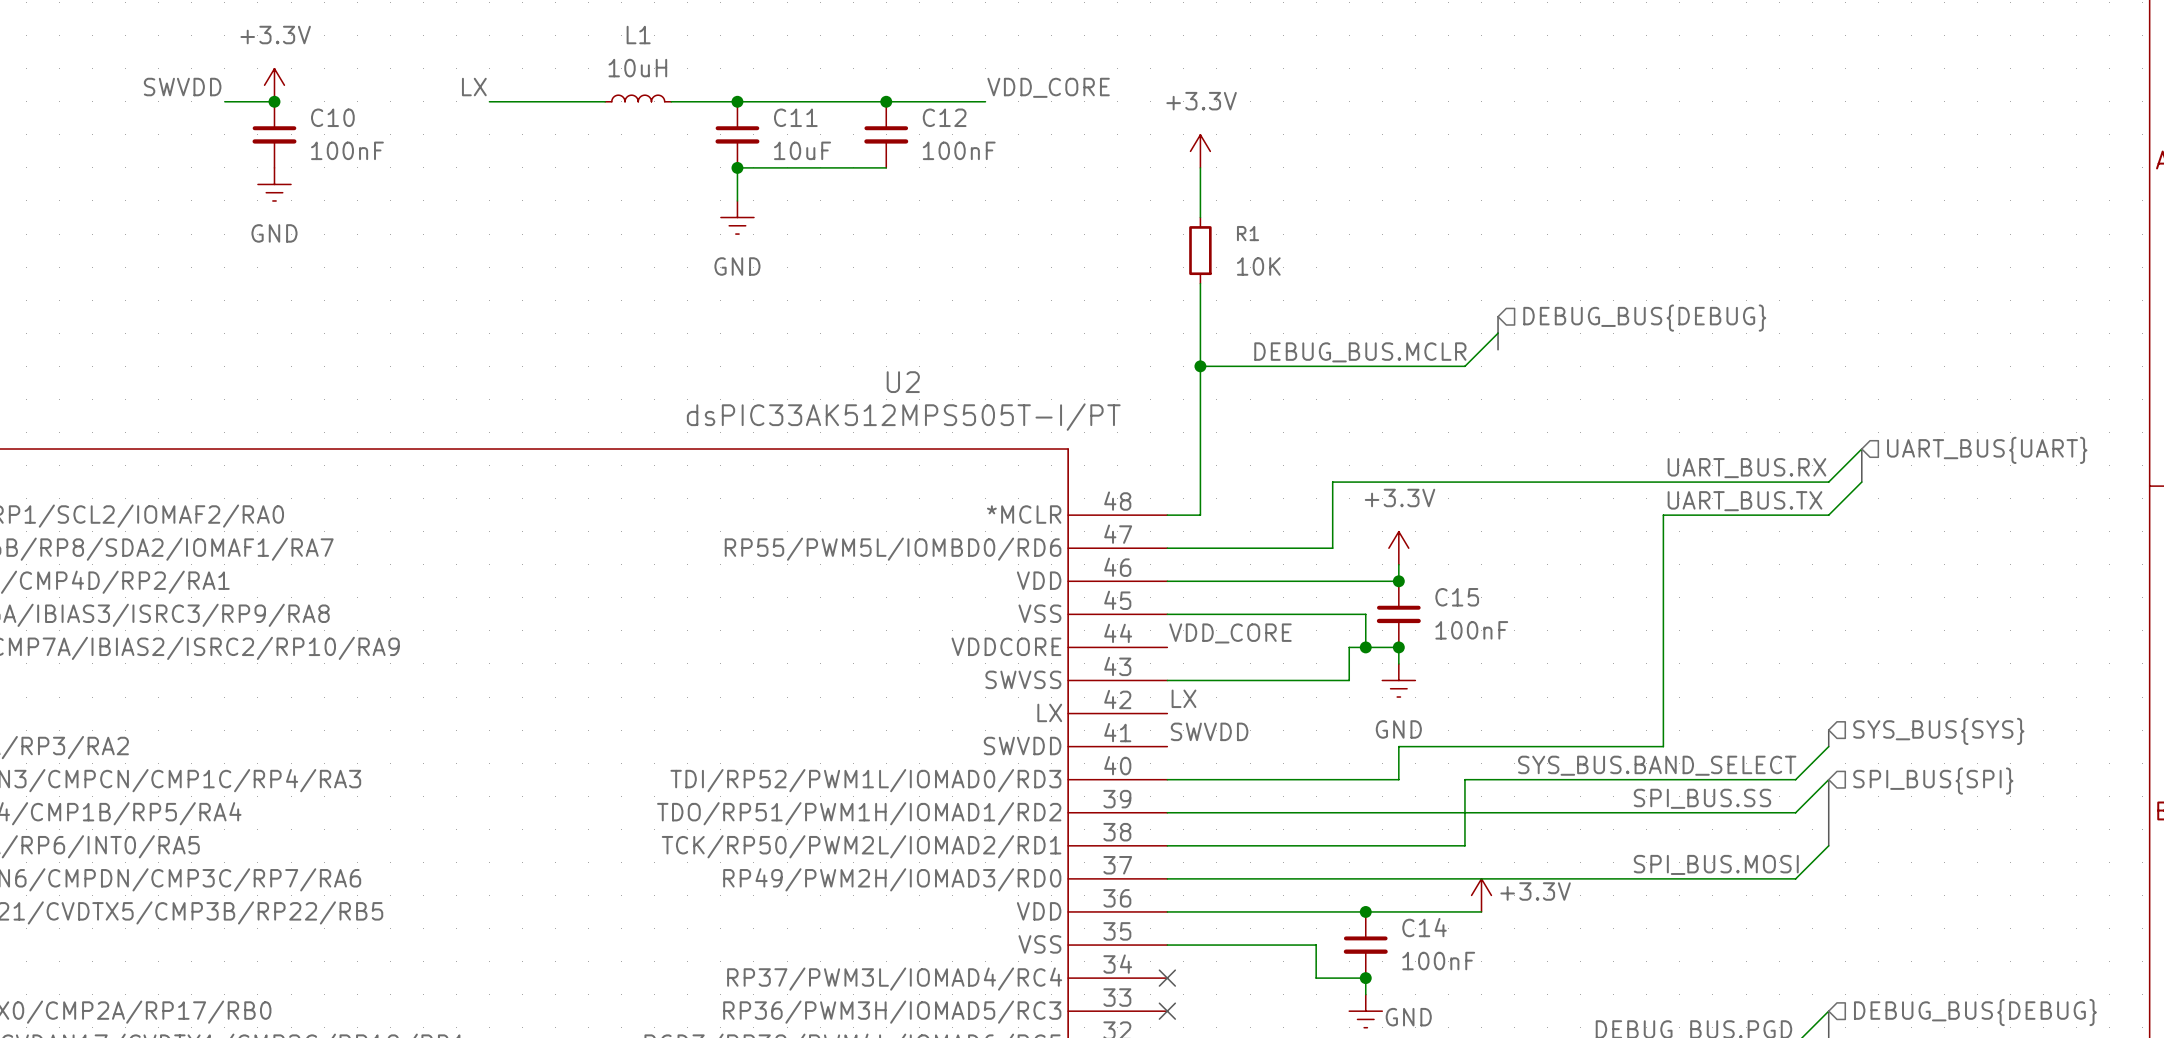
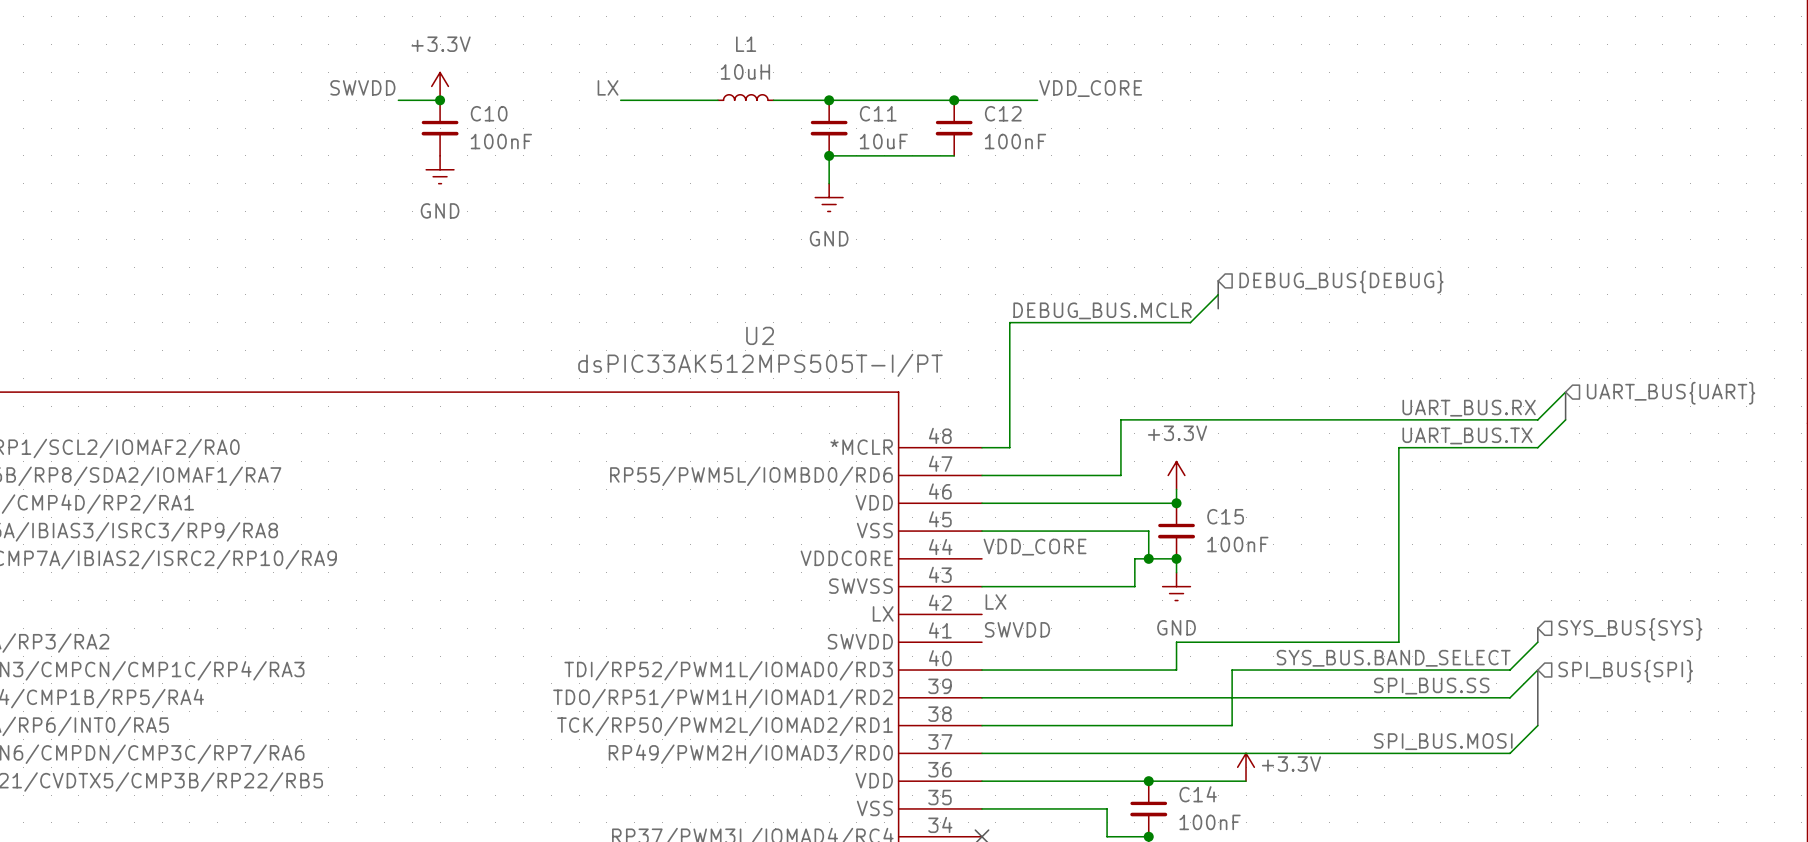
power symbol position: +3.3V (274, 85) -> +3.3V (440, 86)
label position: SWVDD (182, 87) -> SWVDD (362, 87)
label position: LX (474, 87) -> LX (608, 87)
label position: VDD_CORE (1048, 87) -> VDD_CORE (1090, 88)
L1 position: (638, 98) -> (745, 97)
wire: (224, 101) (274, 101) -> none
junction: (274, 101) -> none
wire: none -> (398, 100) (412, 100)
wire: (522, 101) (605, 101) -> none
junction: none -> (440, 100)
wire: (671, 101) (737, 101) -> none
junction: (737, 101) -> none
wire: (853, 101) (919, 101) -> none
junction: (886, 101) -> none
wire: none -> (829, 100) (1037, 100)
junction: none -> (829, 100)
junction: none -> (954, 100)
C10 position: (274, 134) -> (440, 128)
C11 position: (737, 134) -> (829, 128)
C12 position: (886, 134) -> (954, 128)
power symbol: +3.3V (1200, 151) -> none
junction: (737, 167) -> none
wire: (886, 167) (737, 167) (737, 200) -> (954, 155) (829, 155) (829, 183)
junction: none -> (829, 155)
wire: (1200, 167) (1200, 217) -> none
power symbol: GND (274, 184) -> none
power symbol: none -> GND (440, 169)
power symbol: GND (737, 217) -> none
power symbol: none -> GND (829, 197)
R1: 10K (1200, 250) -> none
wire: (1200, 283) (1200, 366) -> none
bus: (1498, 316) (1498, 349) -> (1218, 280) (1218, 308)
hierarchical label position: DEBUG_BUS{DEBUG} (1644, 318) -> DEBUG_BUS{DEBUG} (1341, 282)
wire: (1498, 333) (1464, 366) (1415, 366) -> (1218, 294) (1190, 322)
label position: DEBUG_BUS.MCLR (1360, 352) -> DEBUG_BUS.MCLR (1102, 310)
junction: (1200, 366) -> none

